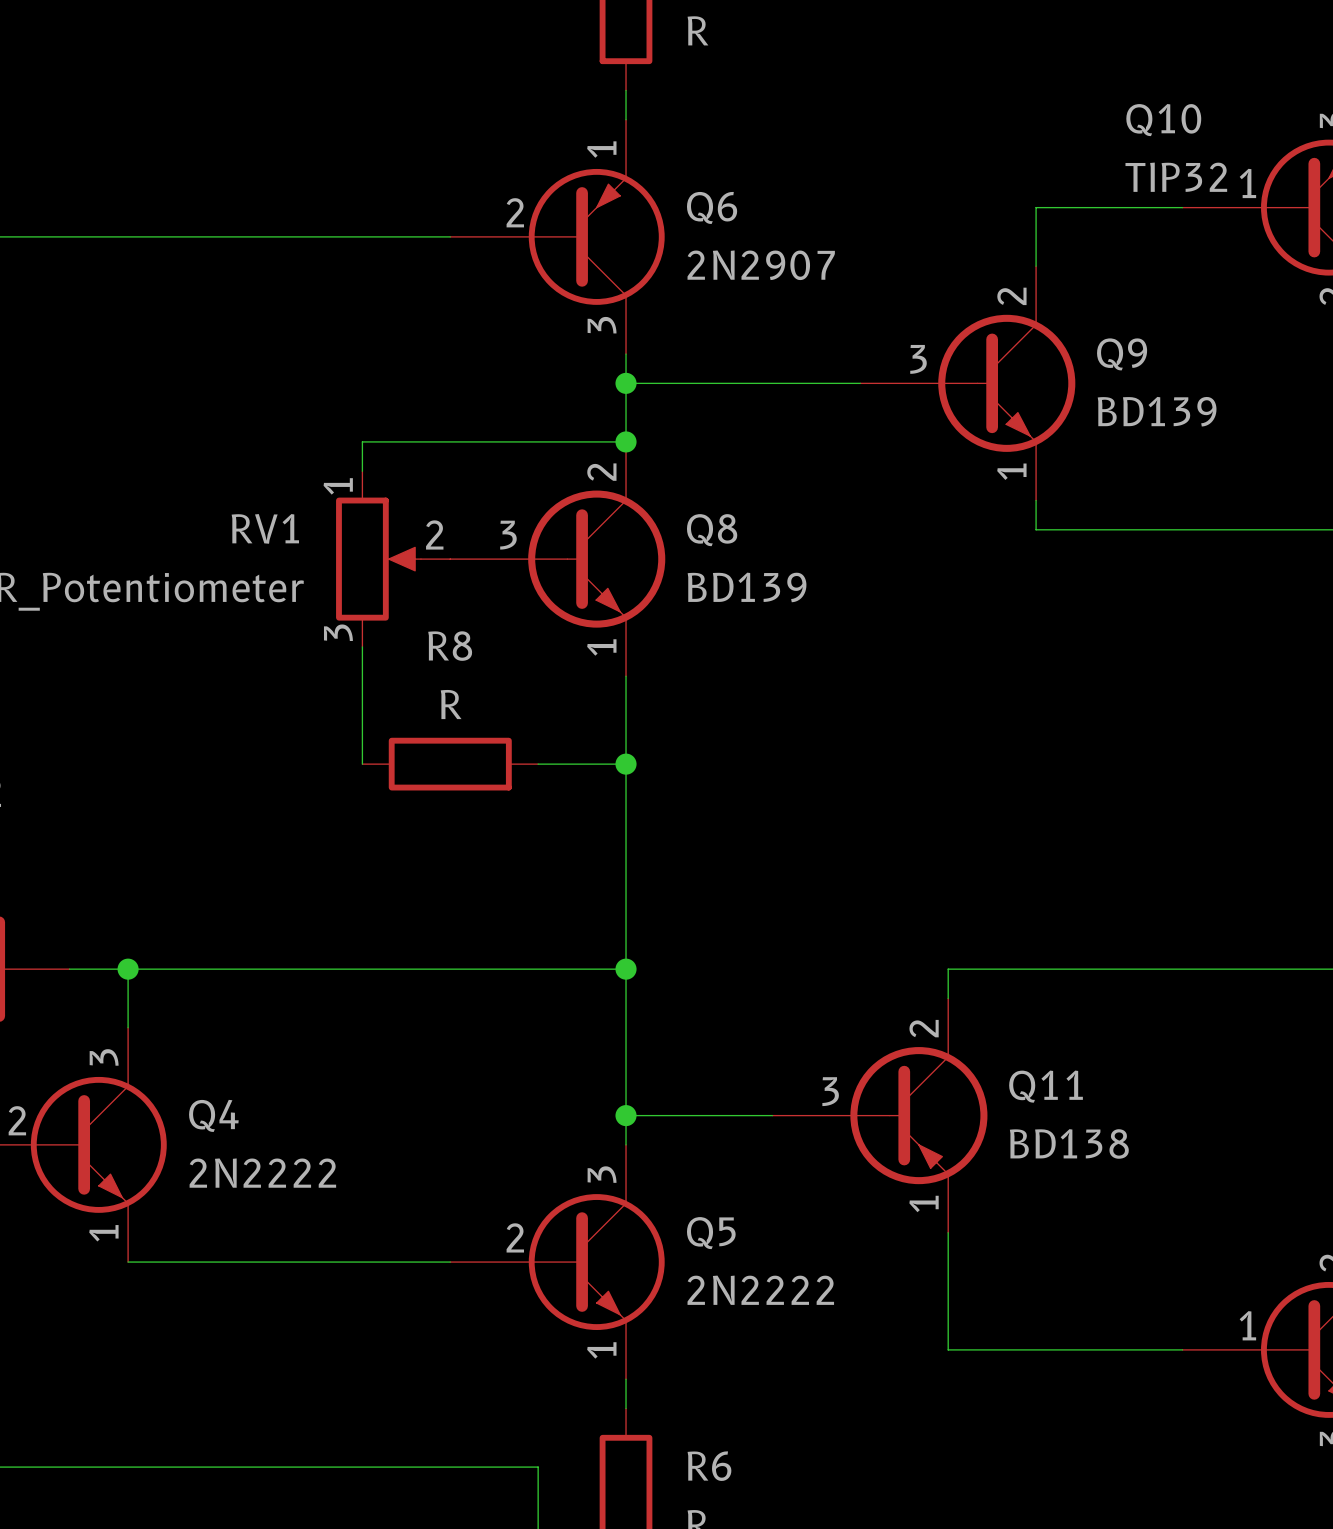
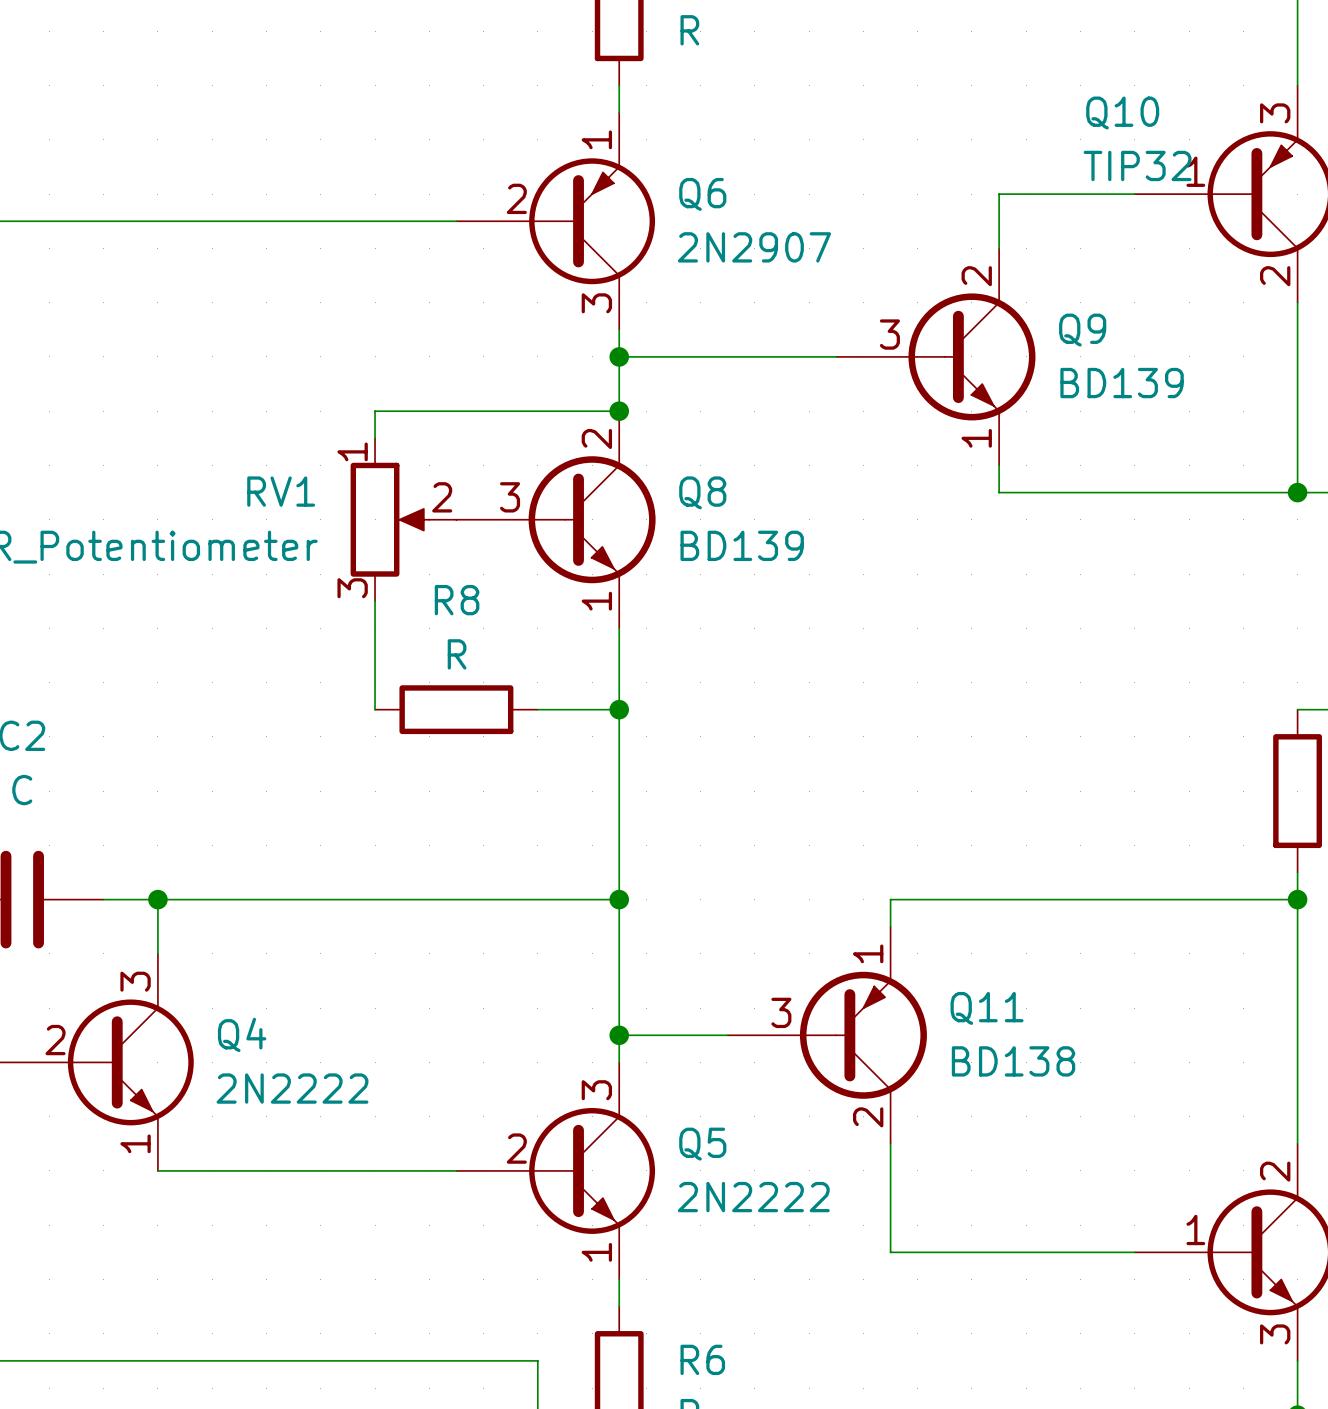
wire: (948, 969) (948, 998) -> (917, 899) (890, 899) (890, 926)
Q11 flip: as is (918, 1115) -> up-down (863, 1035)
wire: (948, 1232) (948, 1349) -> (890, 1143) (890, 1252) (917, 1252)

